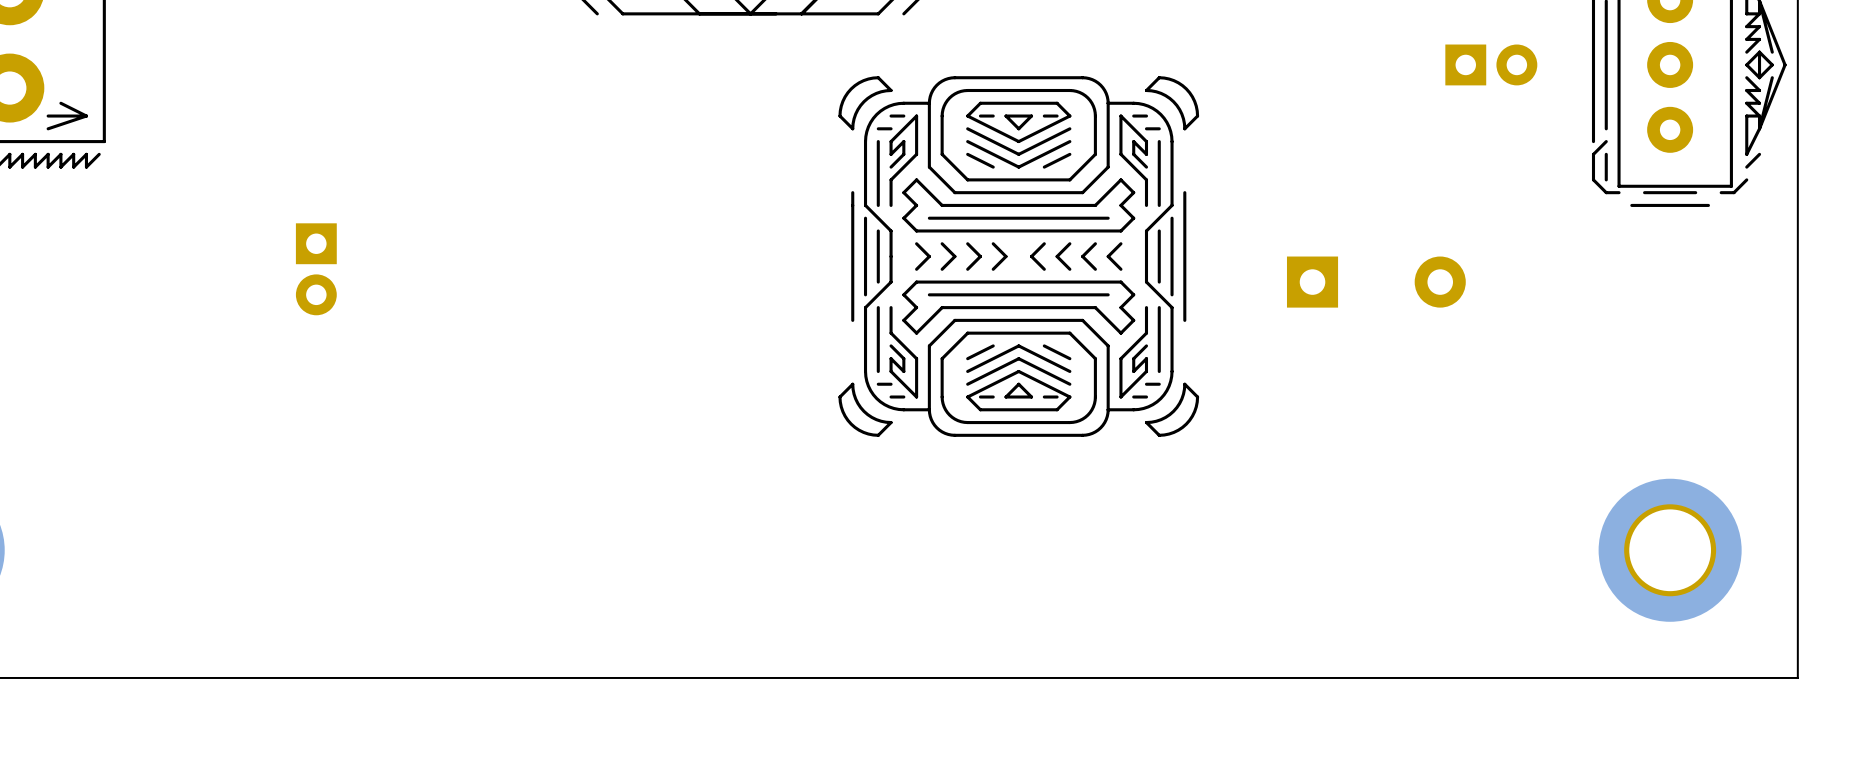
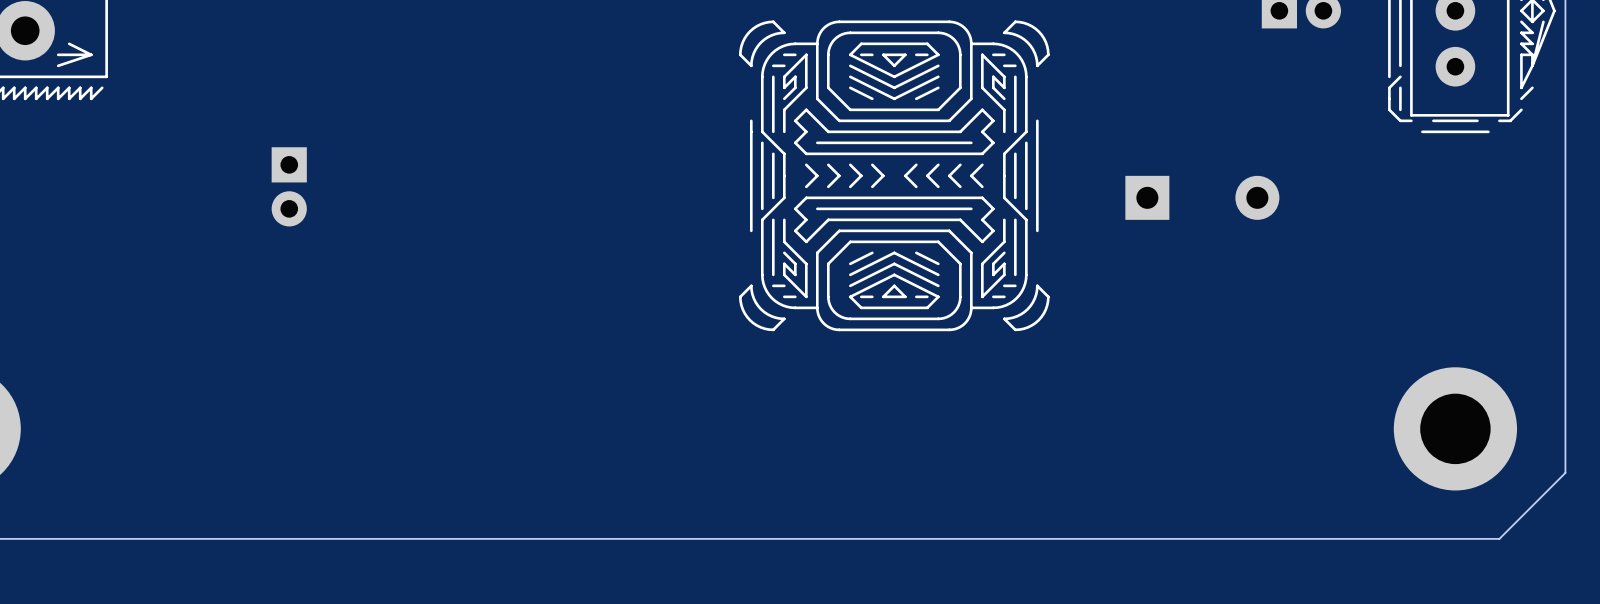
board edge: (1797, 601) (1797, 677) (1721, 677) -> (1565, 472) (1499, 538)

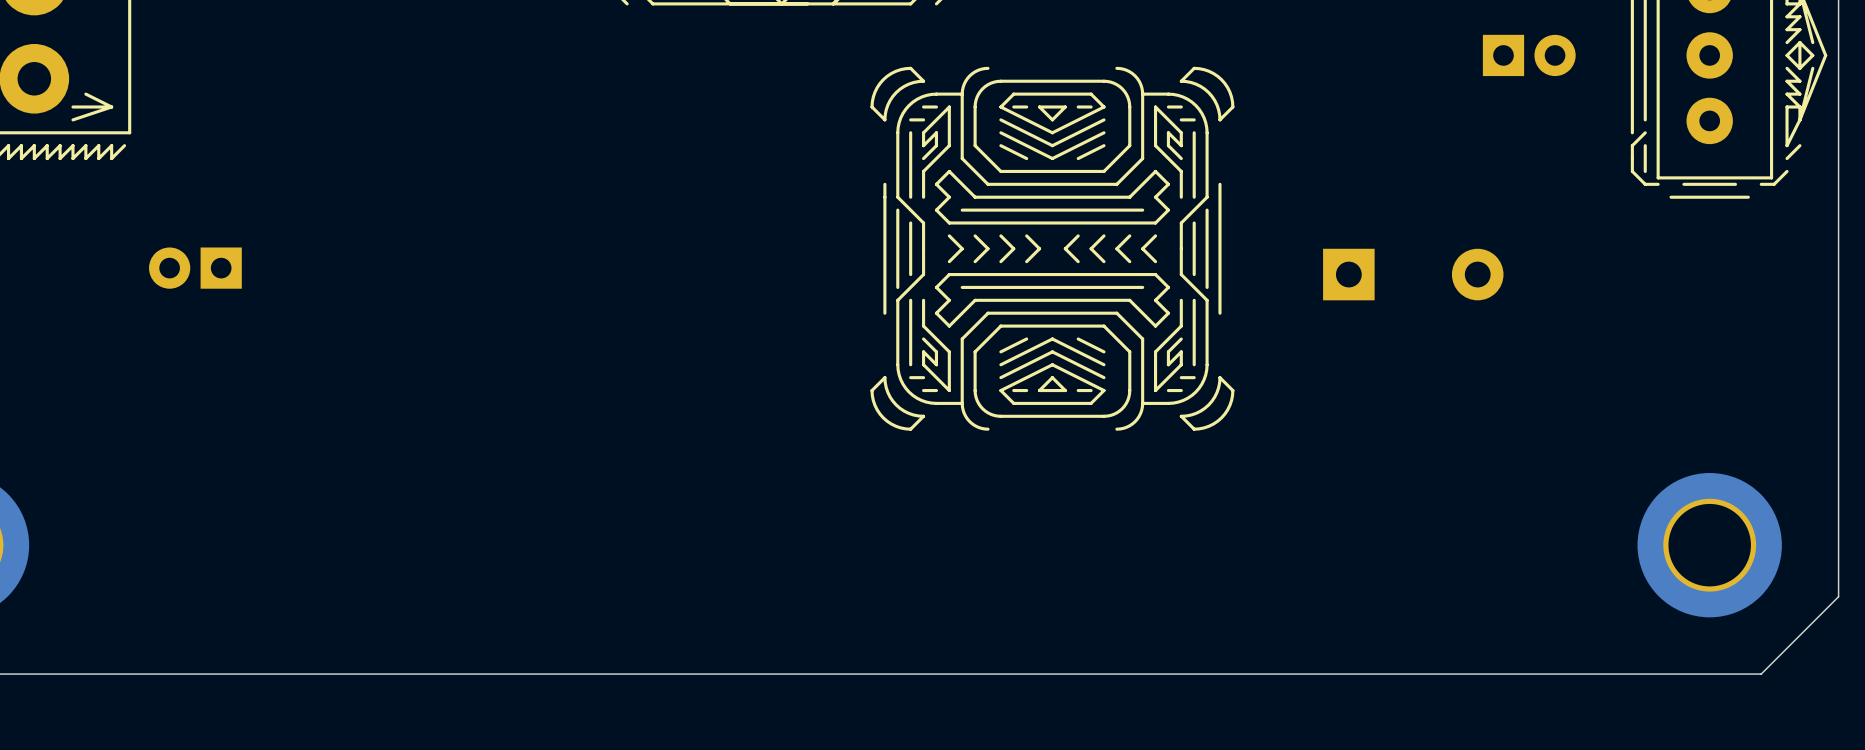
part footprint: [738, 20, 1050, 332] -> [870, 66, 1235, 431]
part rotation: 0° (289, 186) -> 90° clockwise (195, 268)
part position: (289, 186) -> (195, 268)

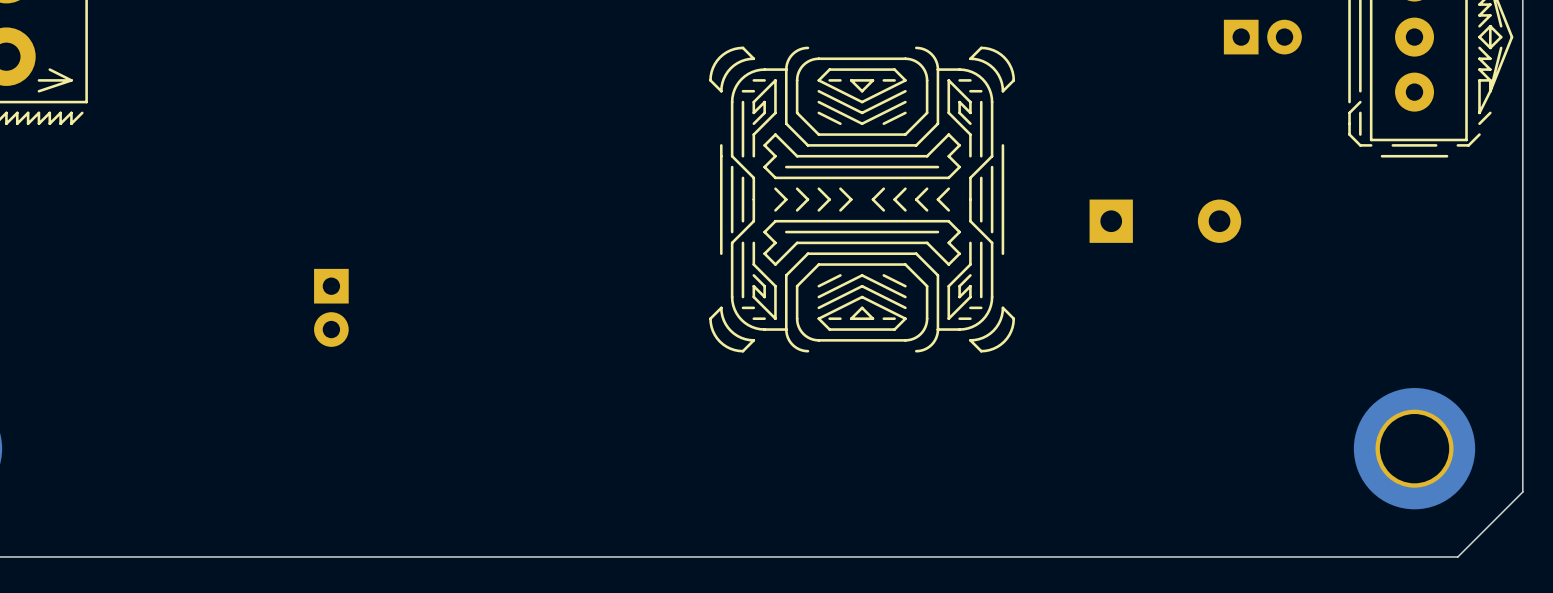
part rotation: 0° (195, 268) -> 90° counterclockwise (331, 307)
part position: (195, 268) -> (331, 307)

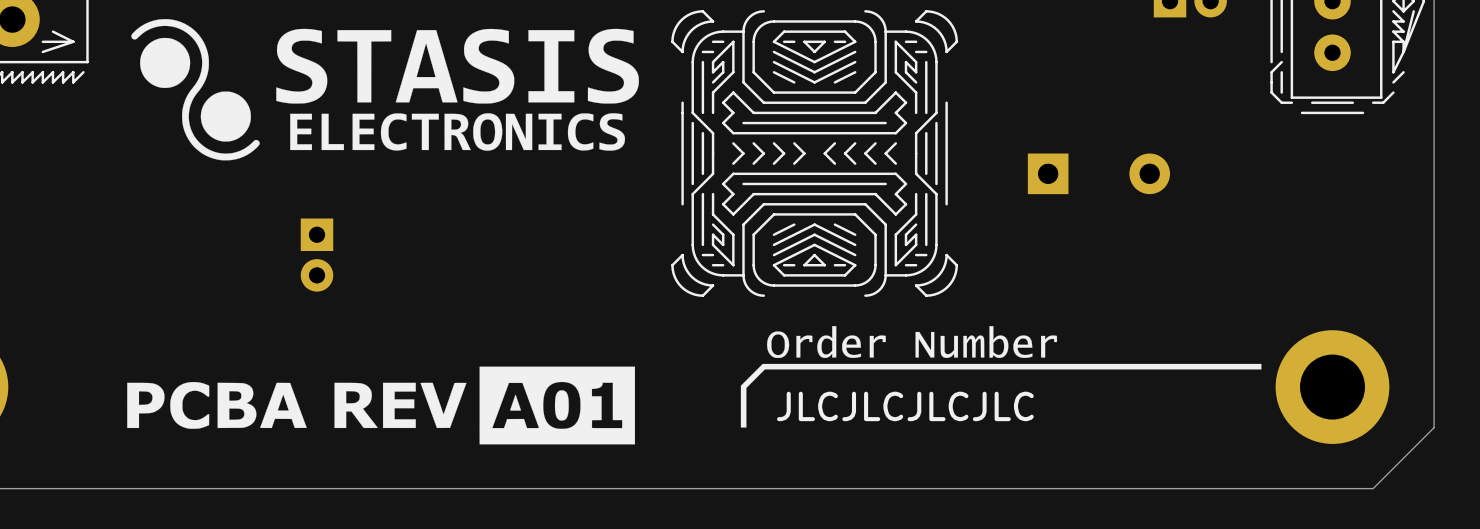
drawing: none -> [127, 19, 1262, 445]
text: none -> JLCJLCJLCJLC (905, 406)

